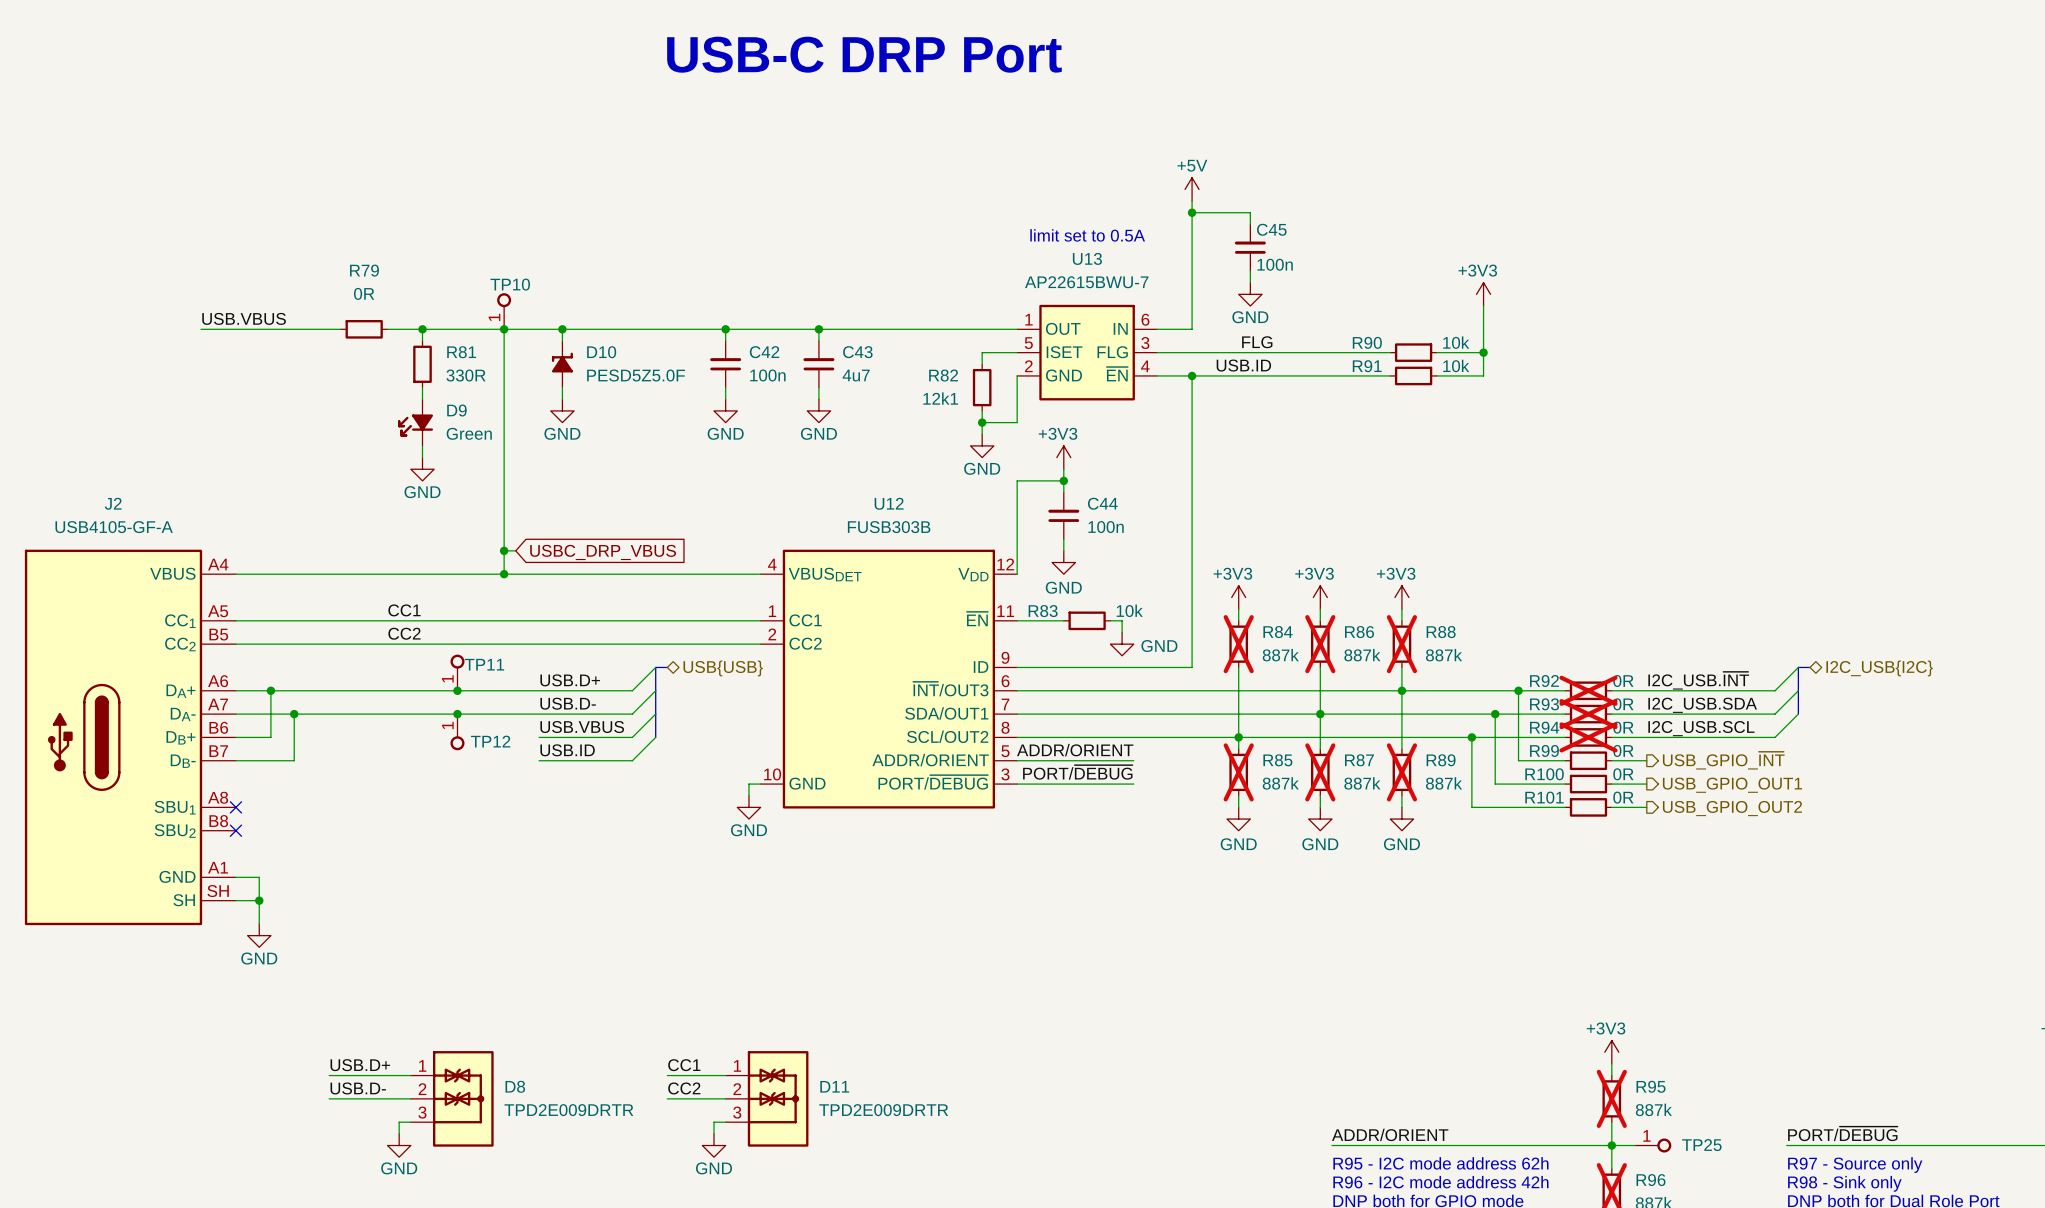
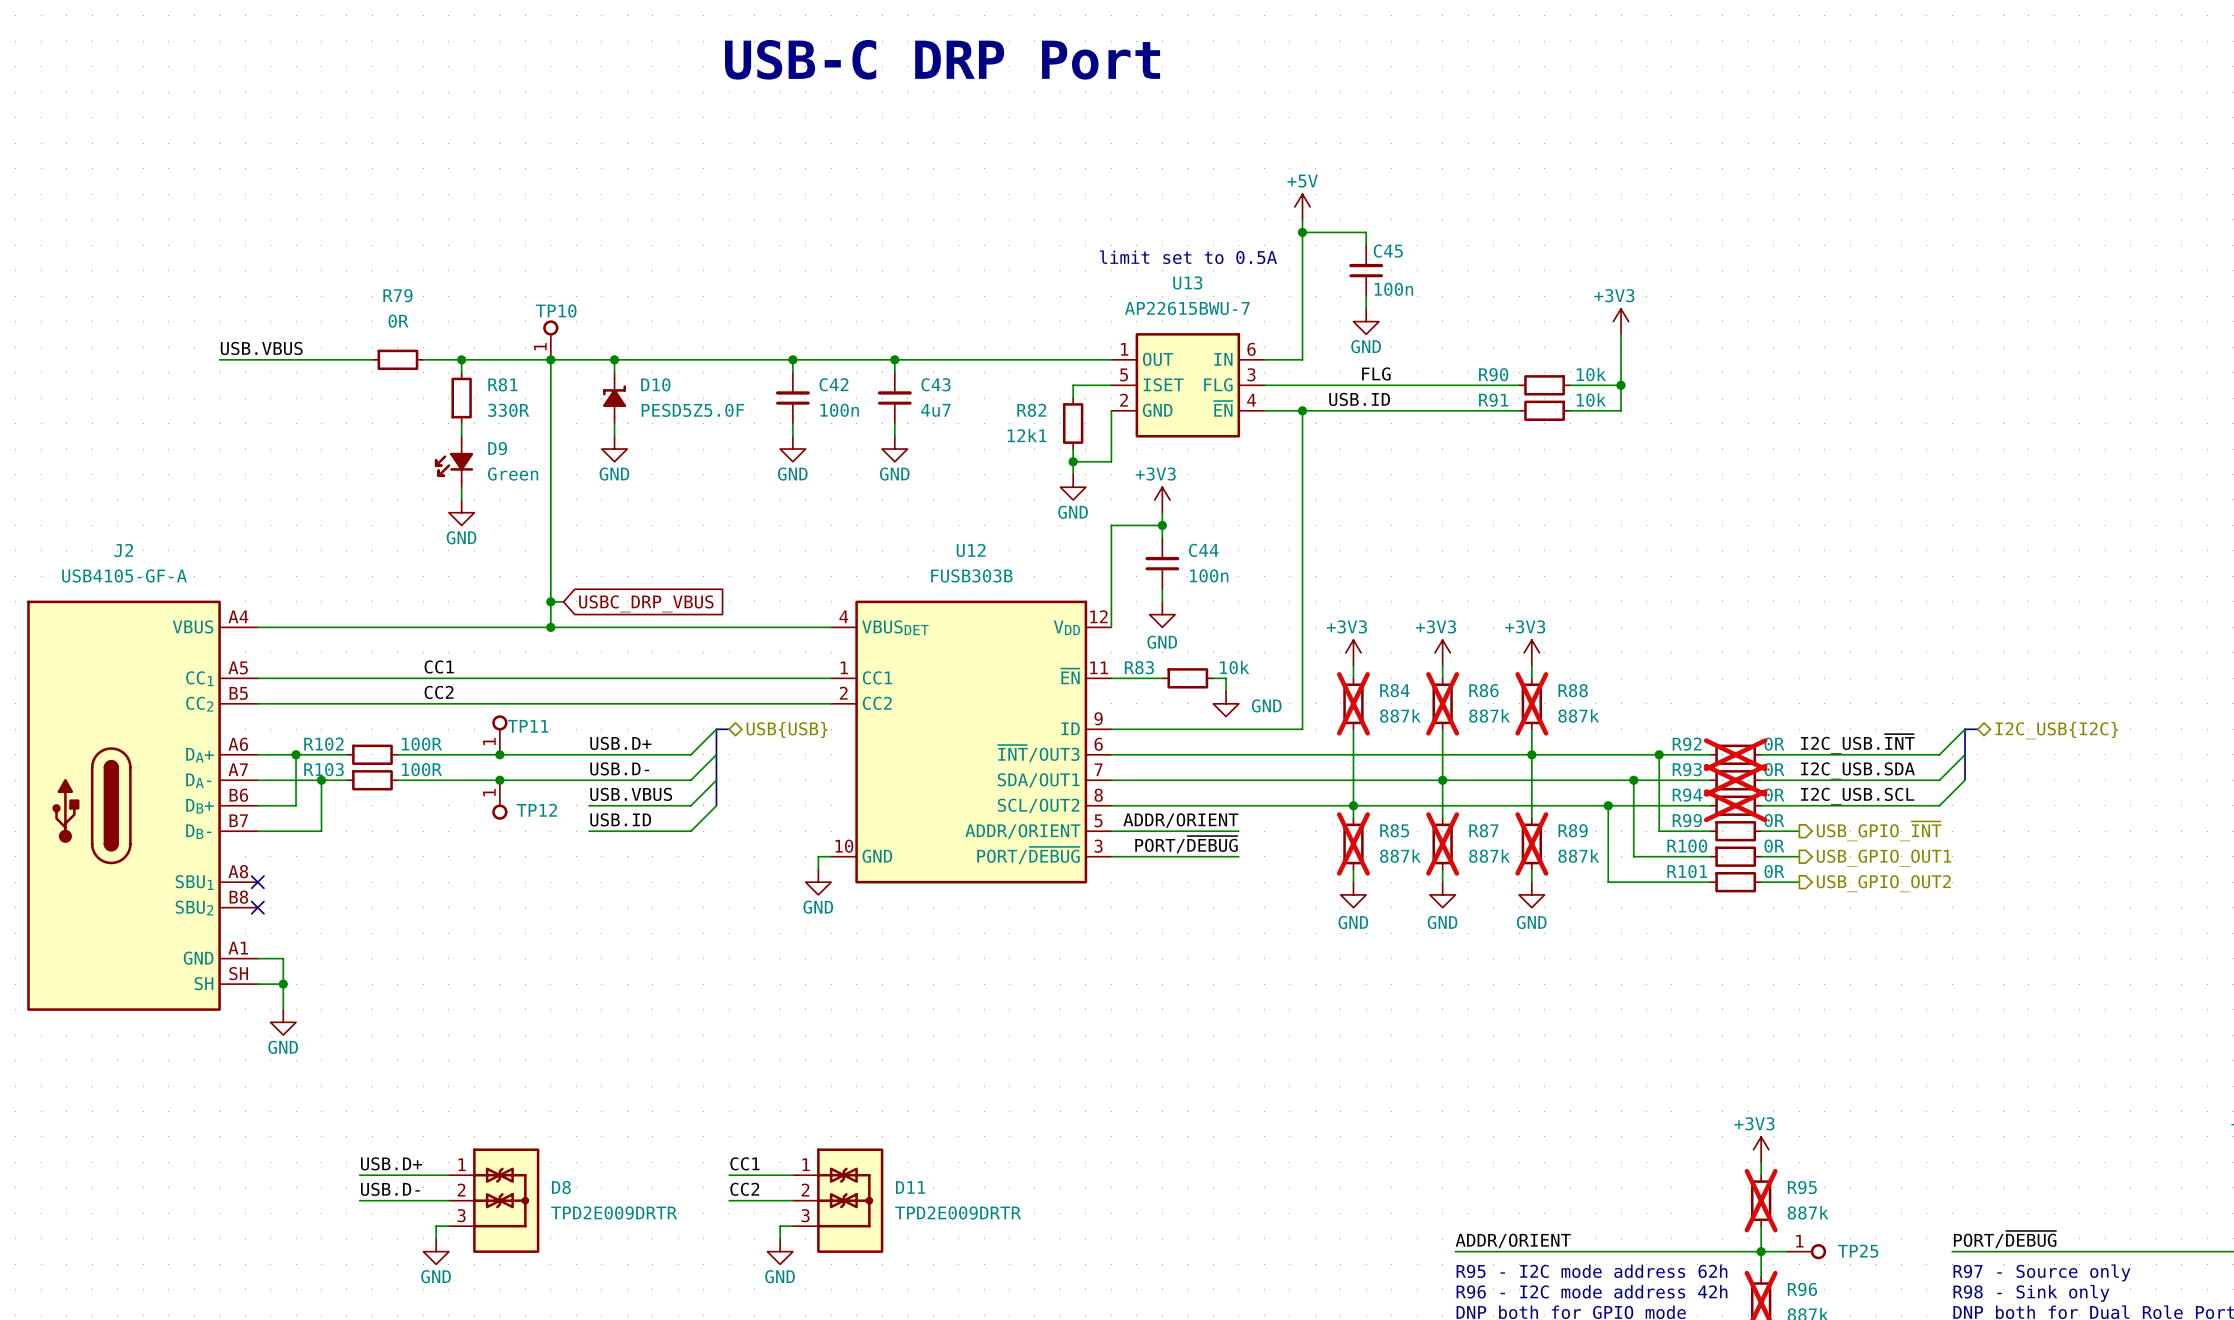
wire: (317, 690) (364, 690) -> none
R102: none -> (372, 754)
wire: (317, 714) (364, 714) -> none
R103: none -> (372, 780)

